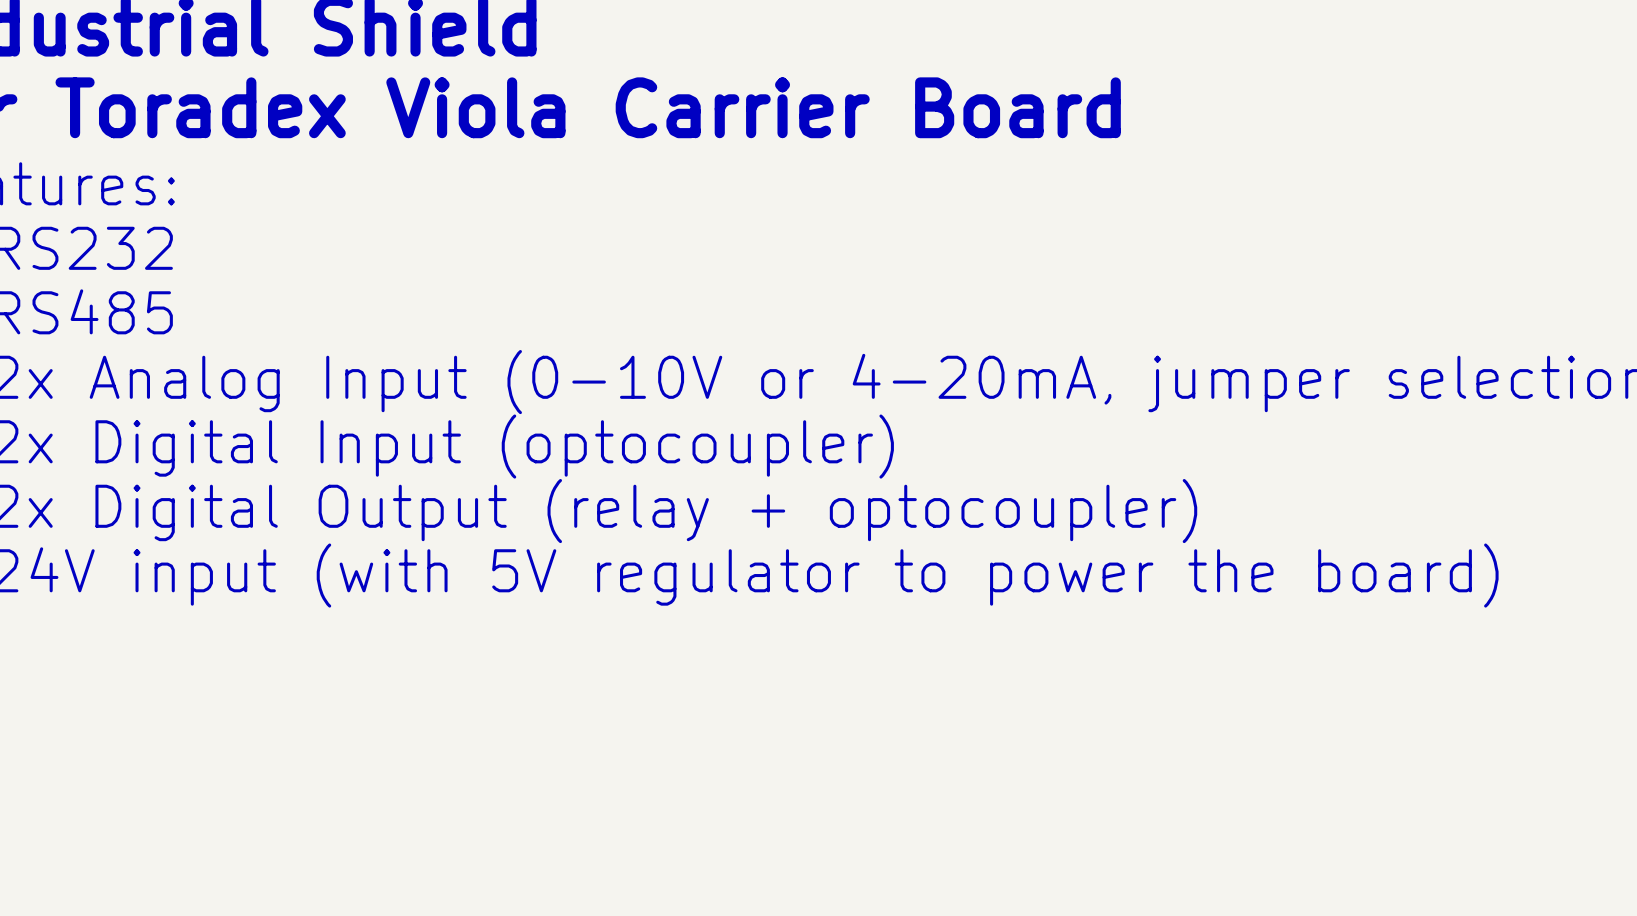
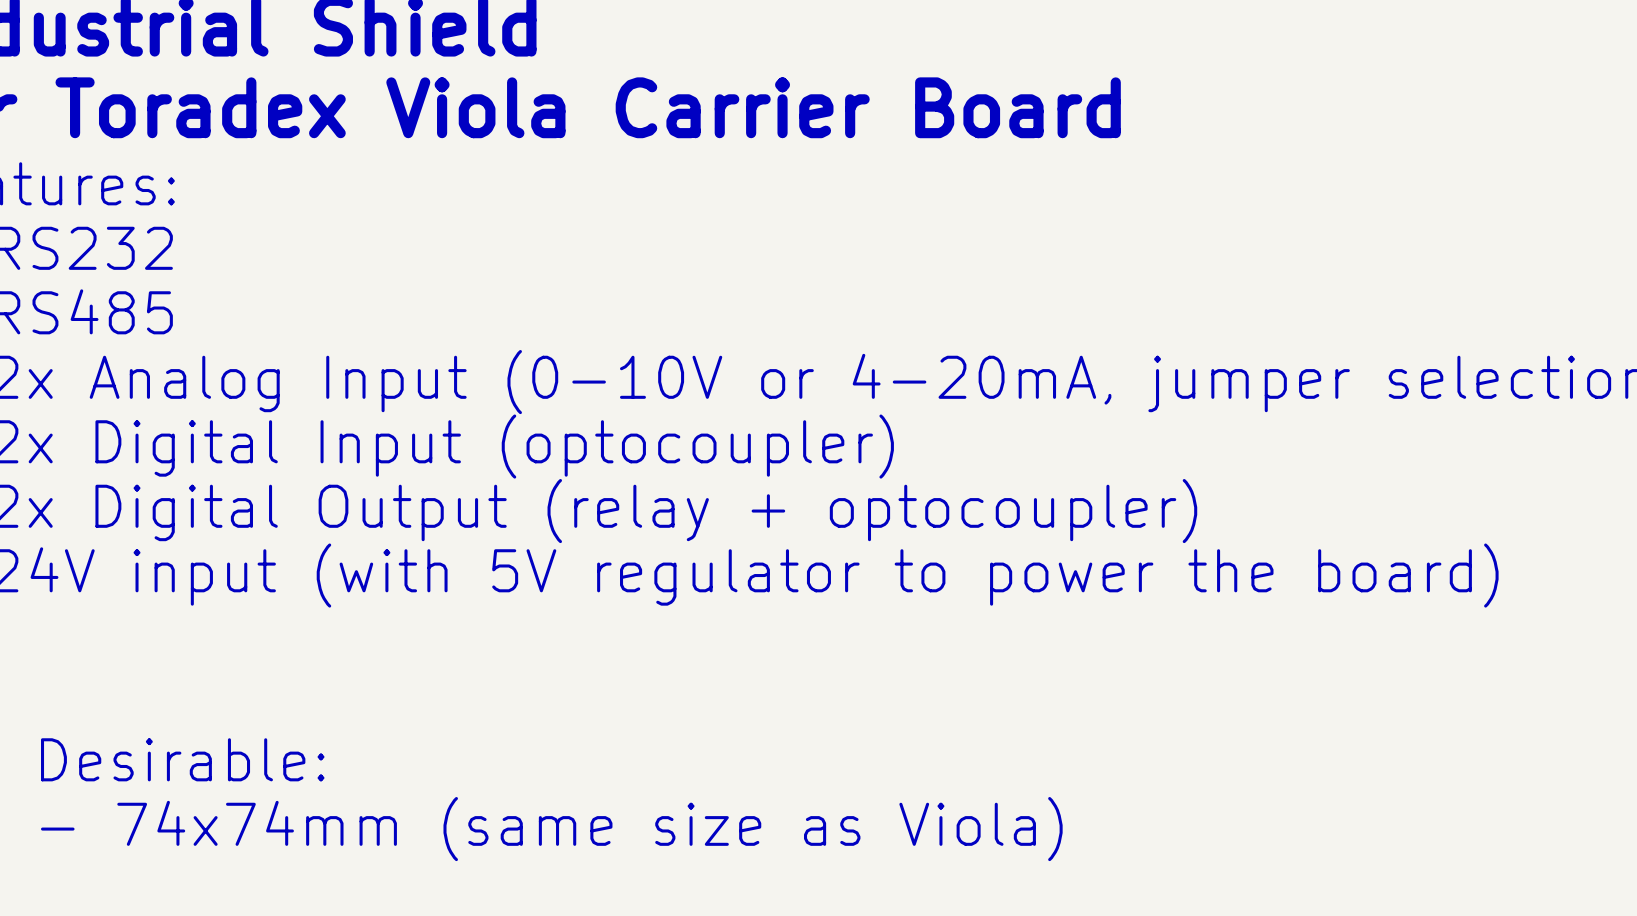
text: none -> Desirable: (182, 759)
text: none -> - 74x74mm (same size as Viola) (551, 829)

